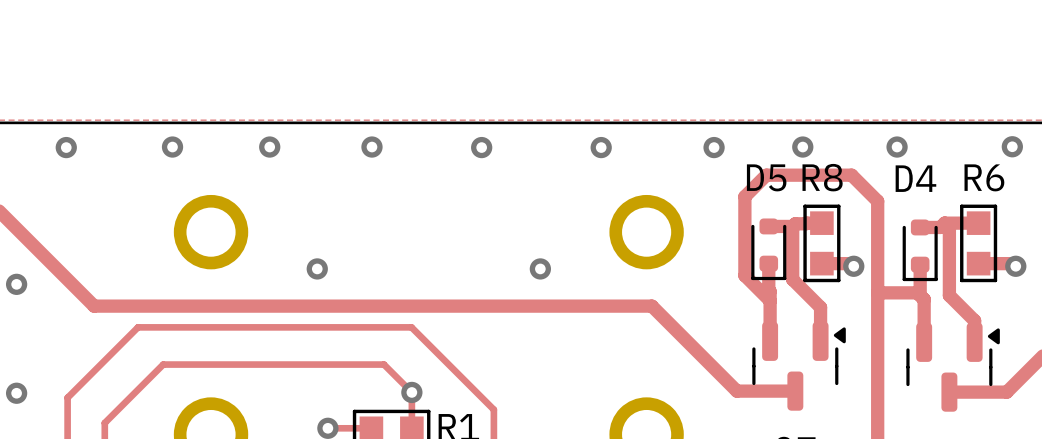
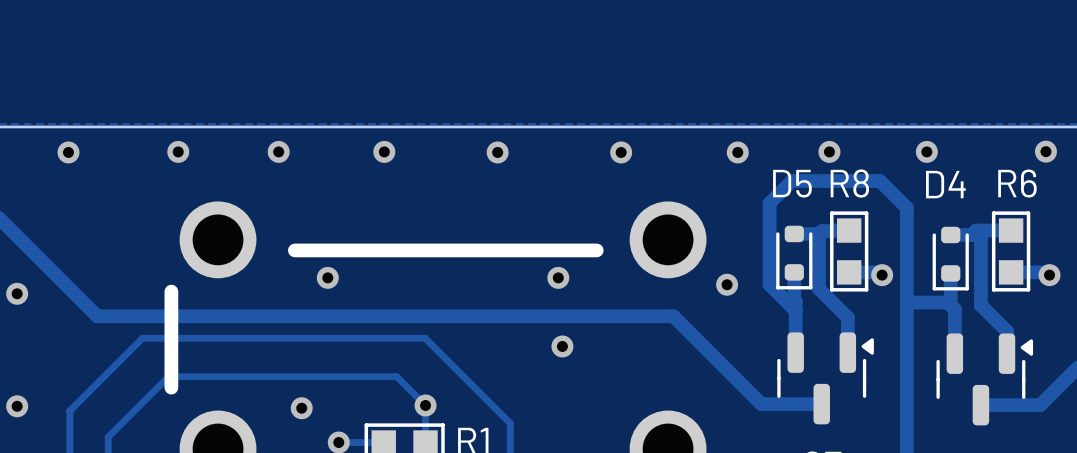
line: none -> (294, 250) (596, 250)
via: none -> (727, 284)
line: none -> (171, 291) (171, 387)
via: none -> (562, 346)
via: none -> (301, 408)

